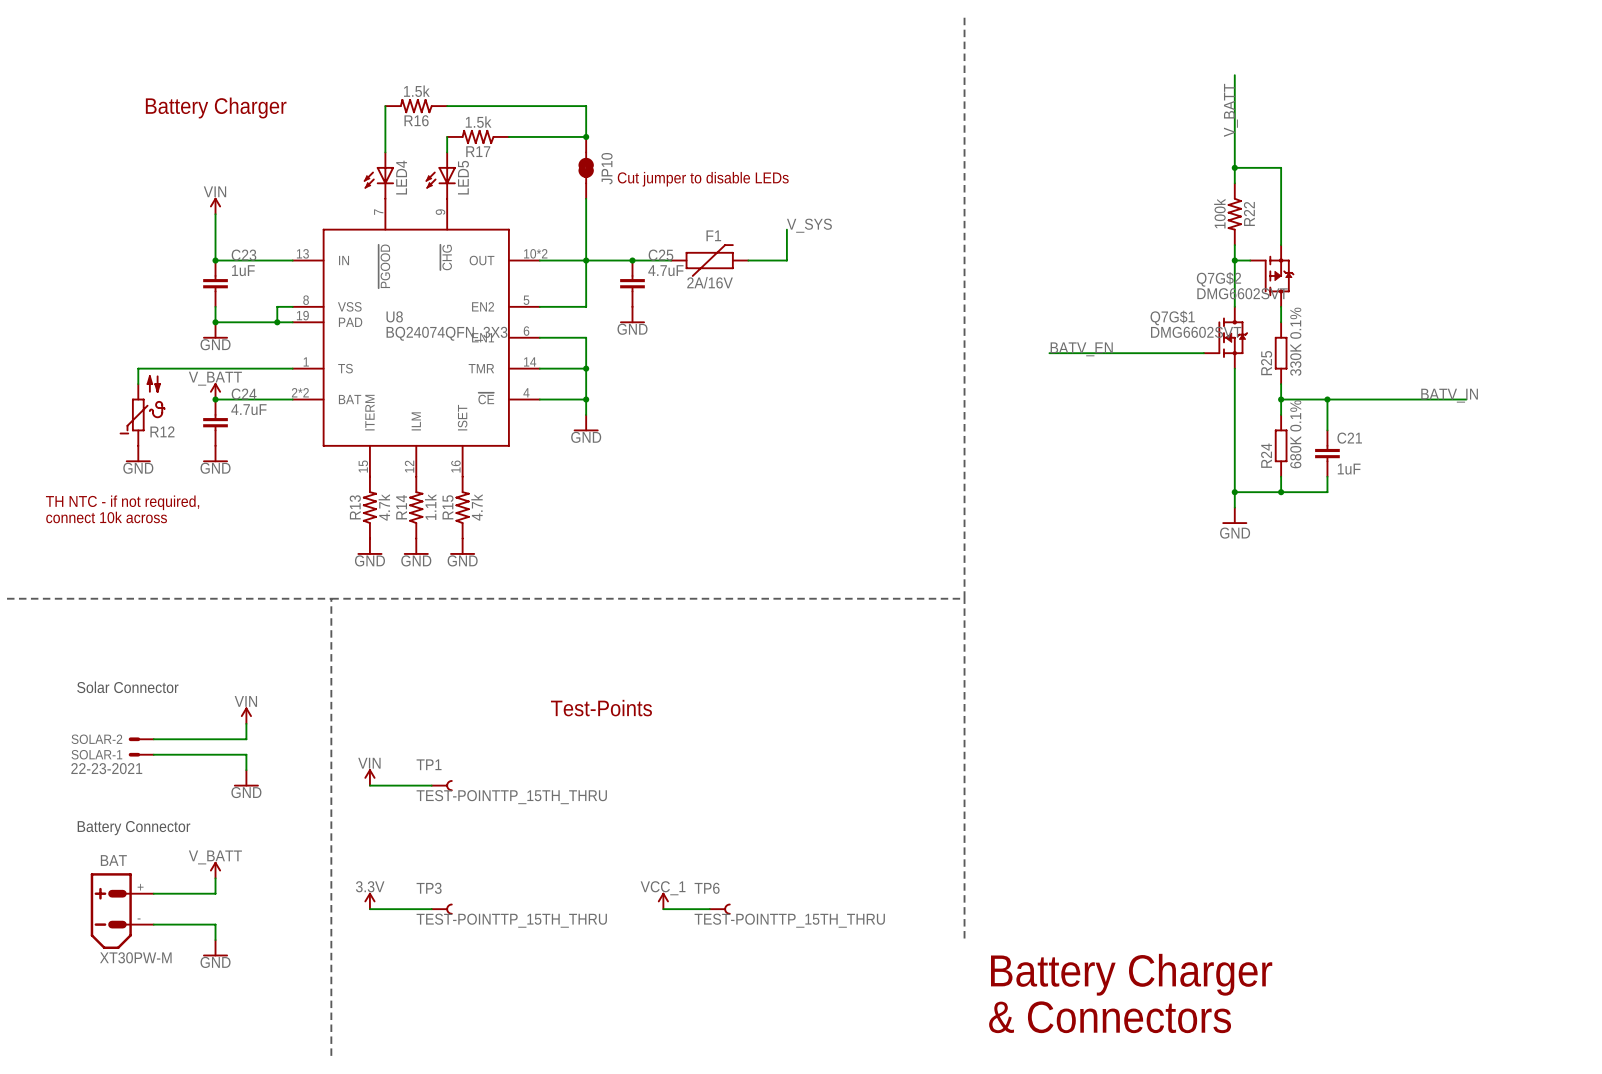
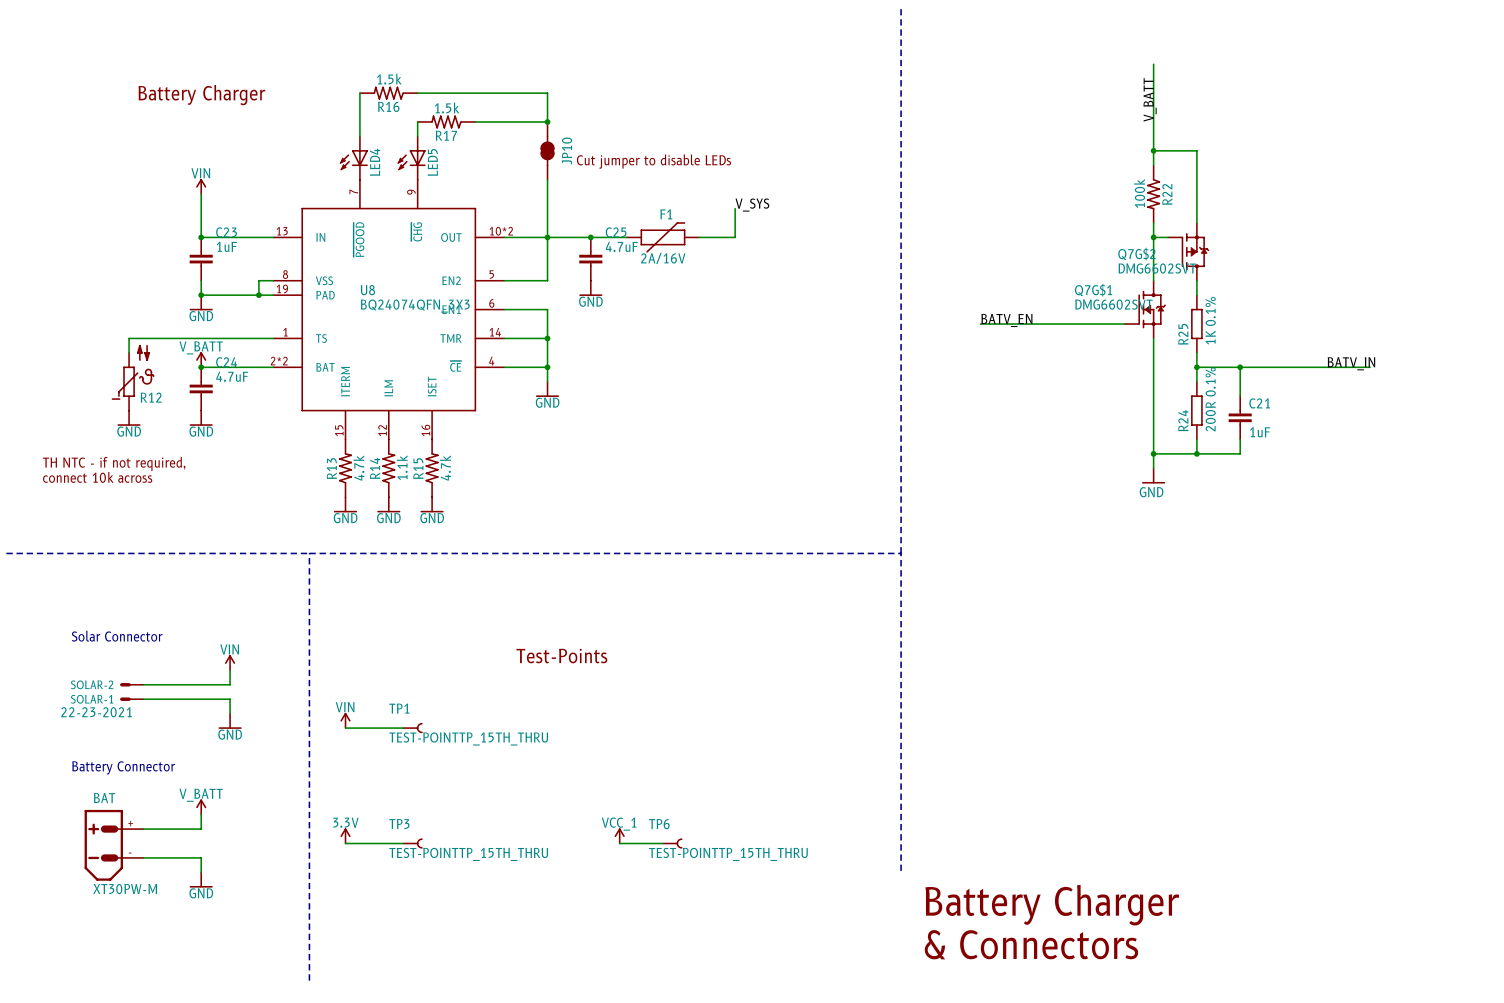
R25 value: 330K 0.1% (1295, 341) -> 1K 0.1% (1210, 320)
R24 value: 680K 0.1% (1295, 434) -> 200R 0.1% (1210, 399)

